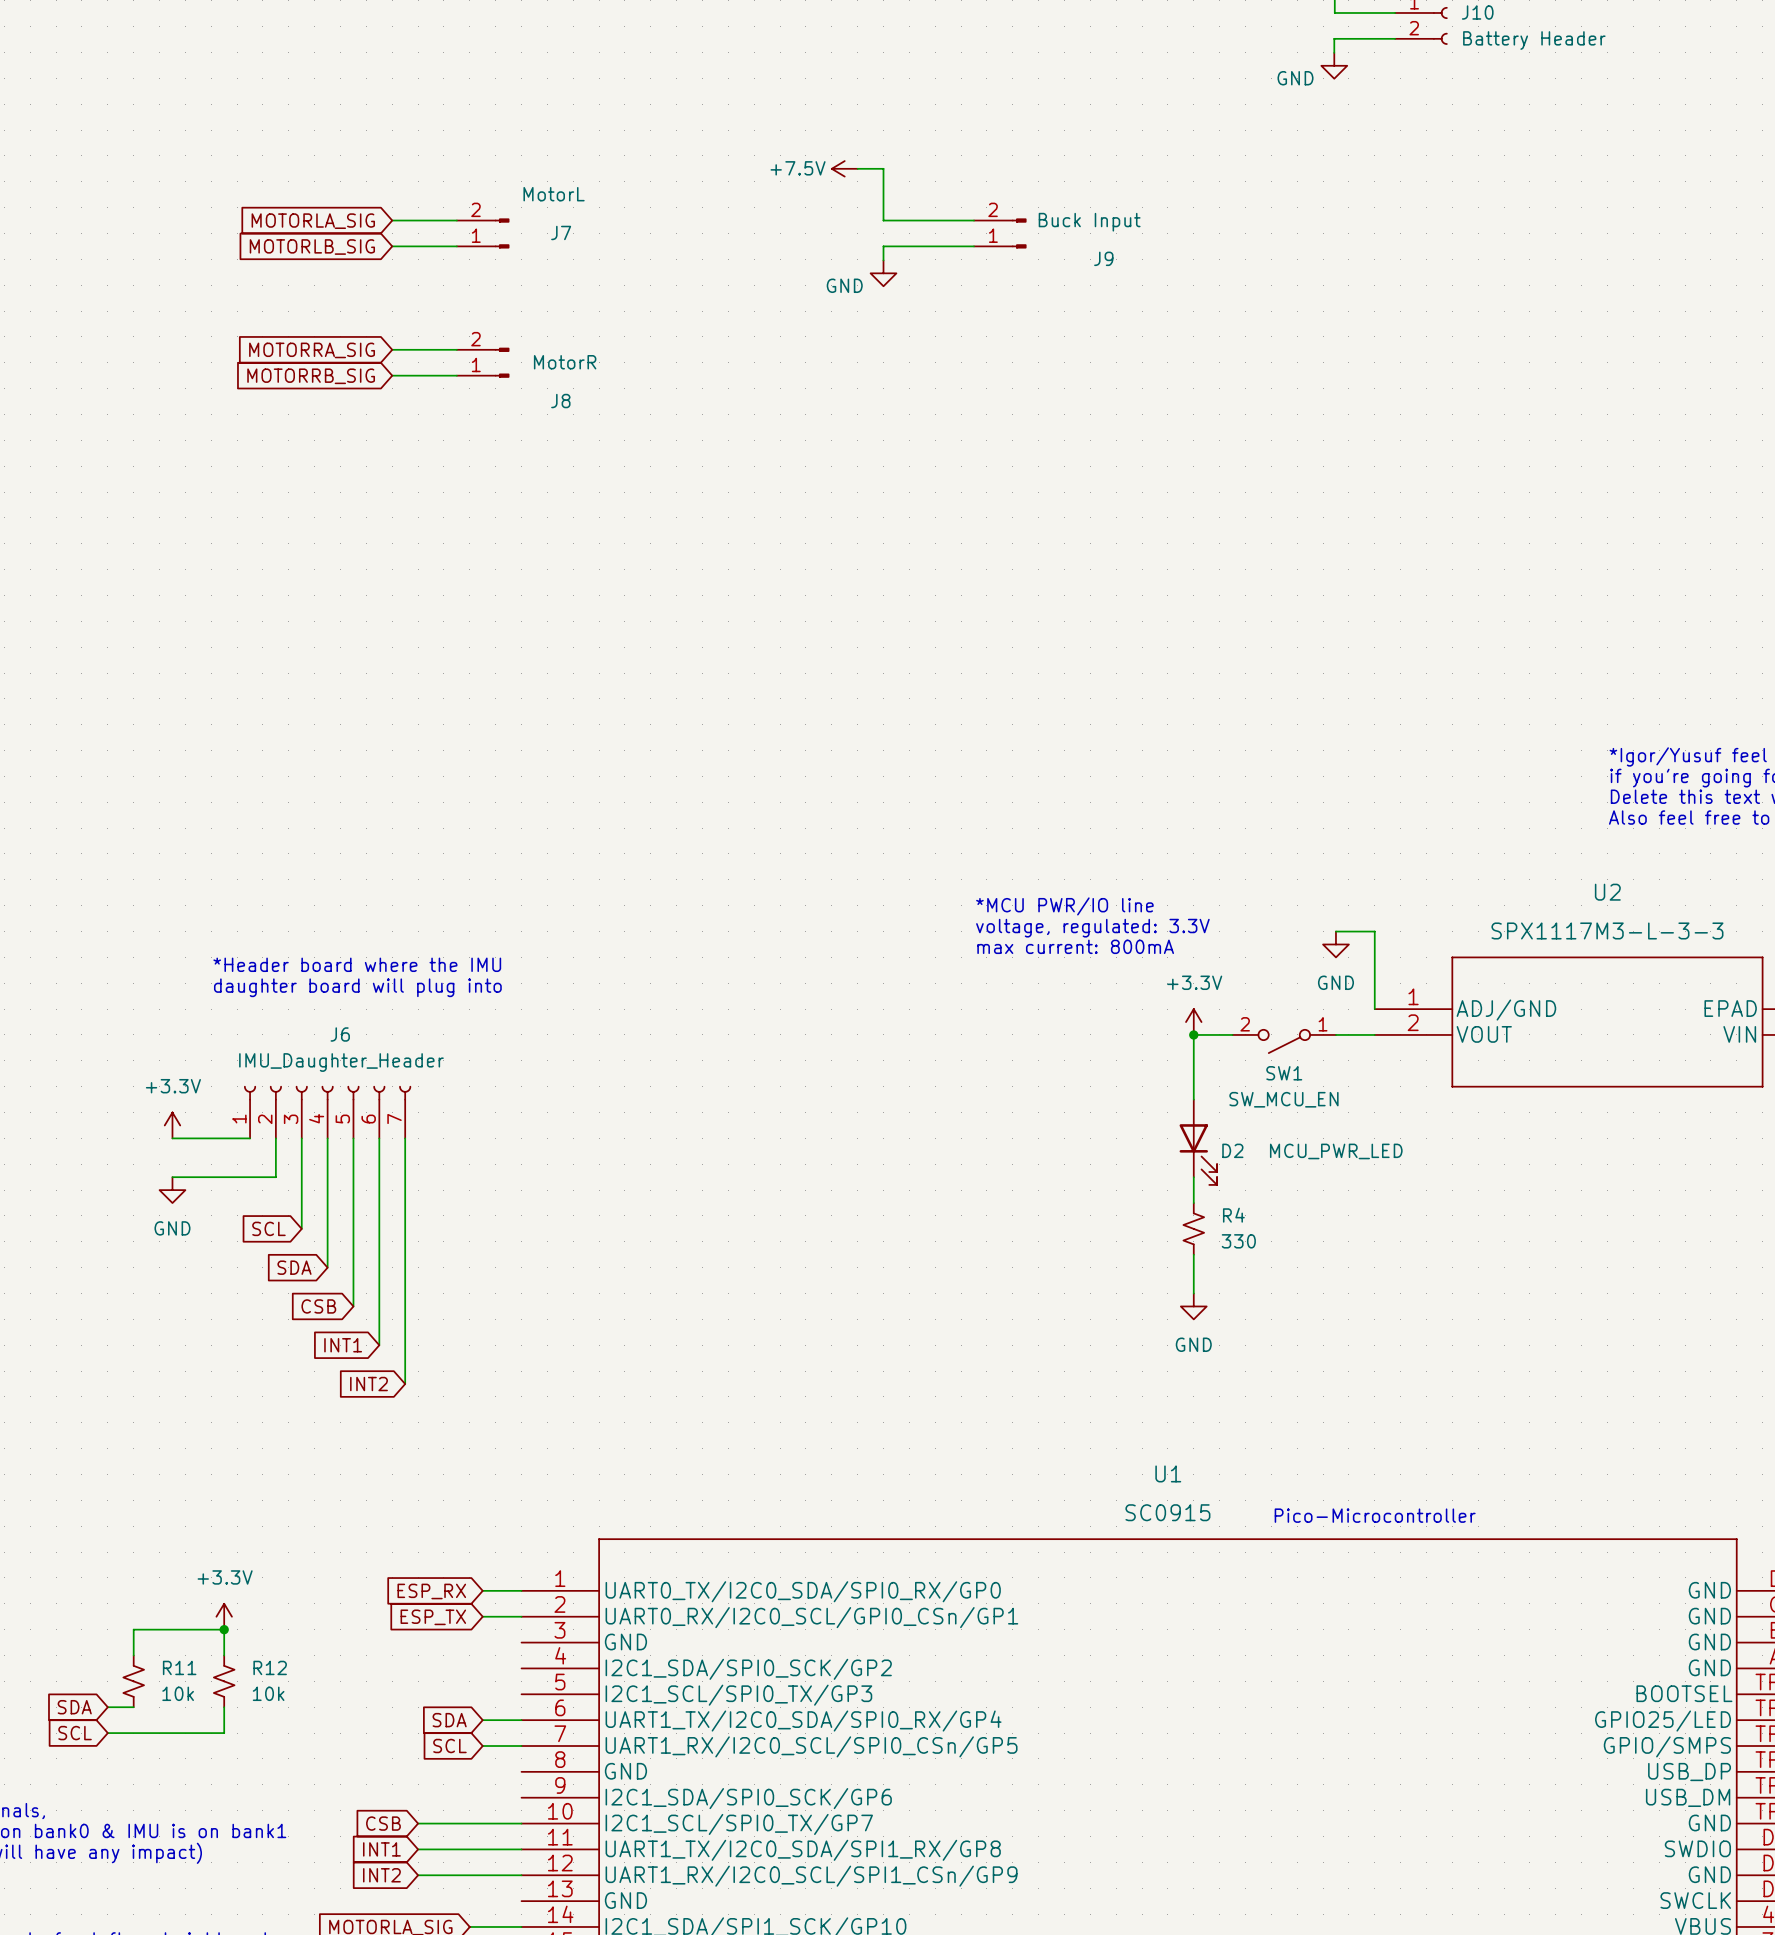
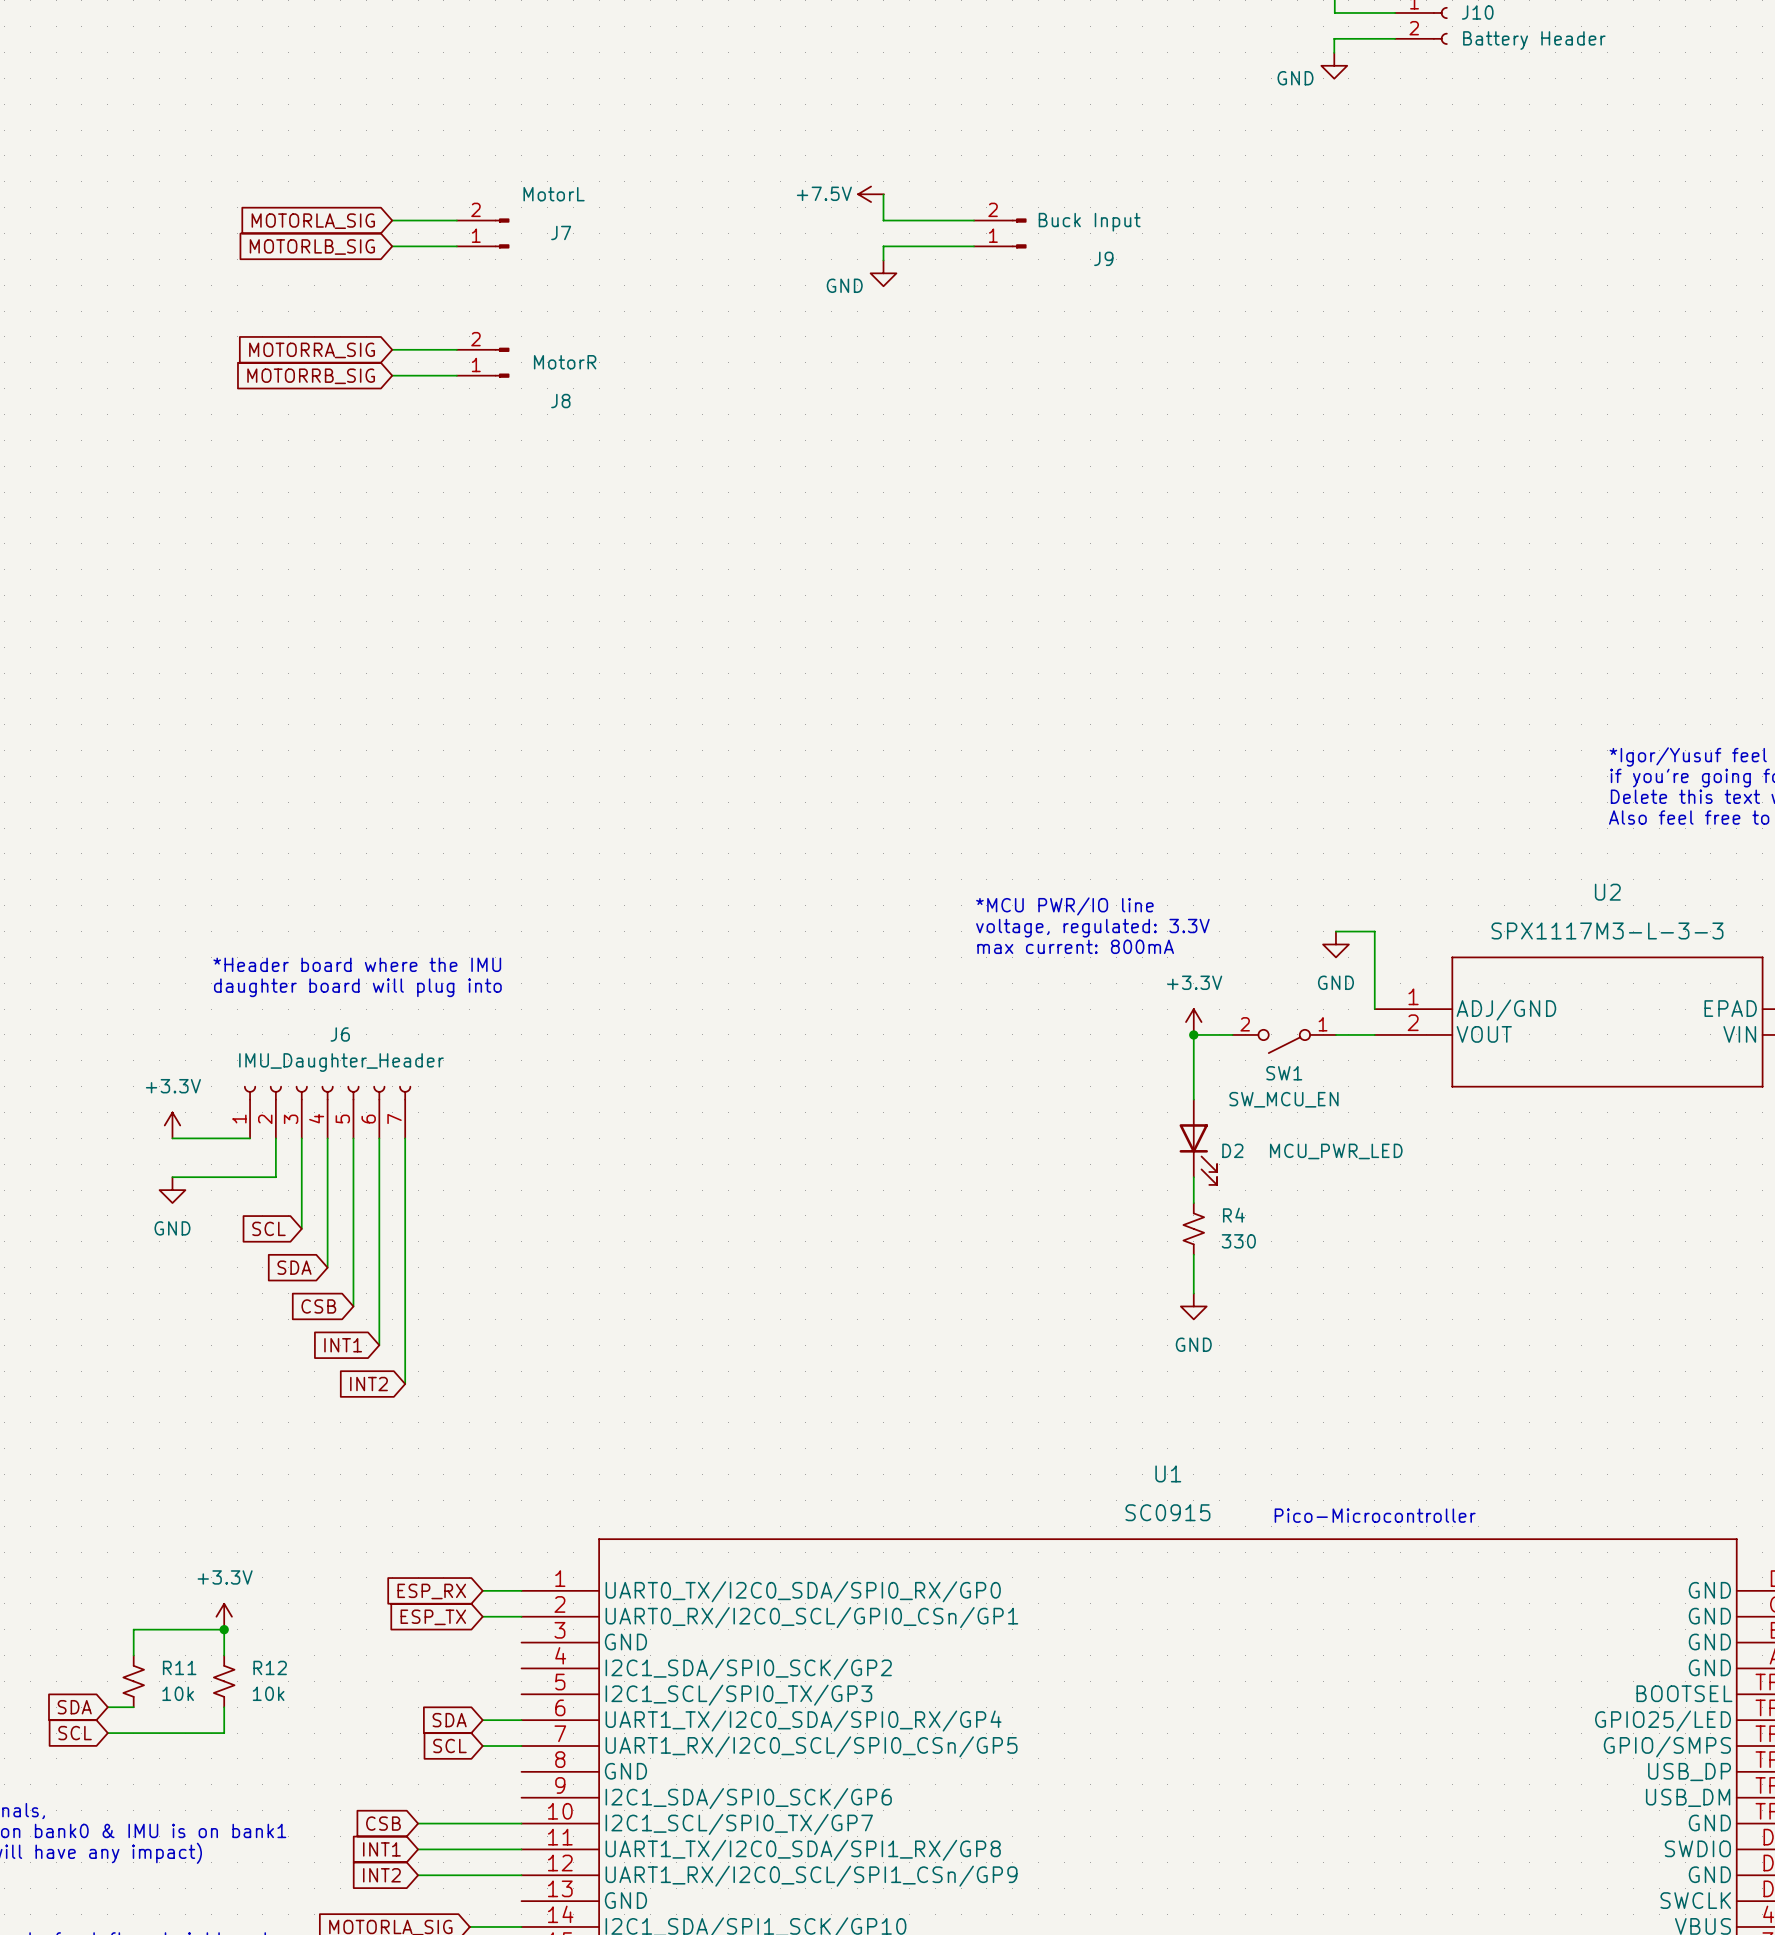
power symbol position: +7.5V (844, 168) -> +7.5V (871, 194)
wire: (857, 168) (883, 168) (883, 194) -> none

